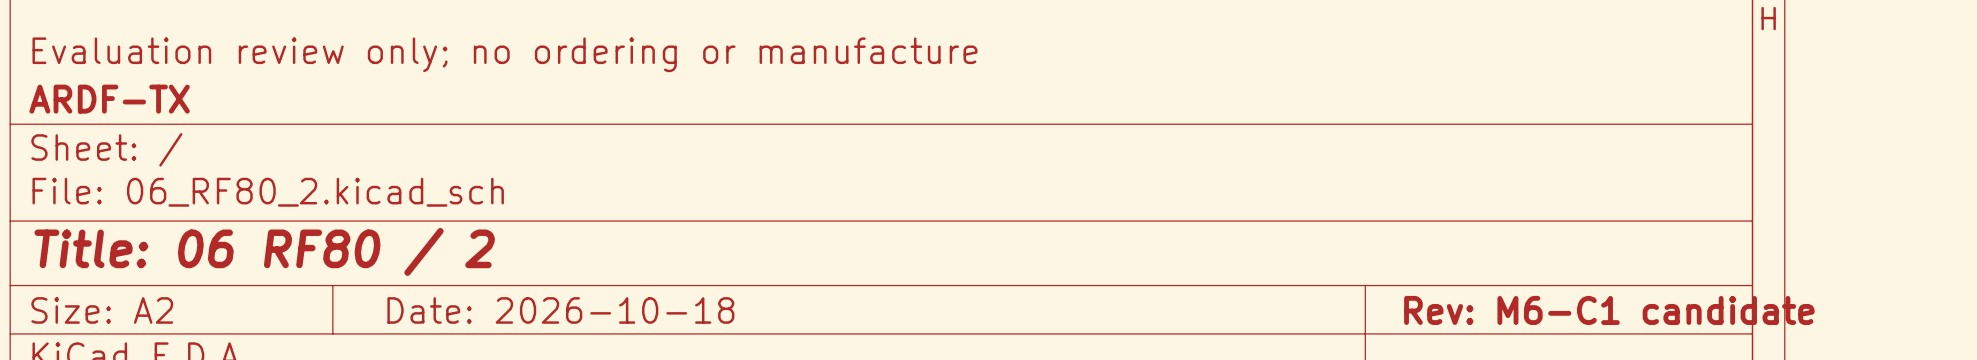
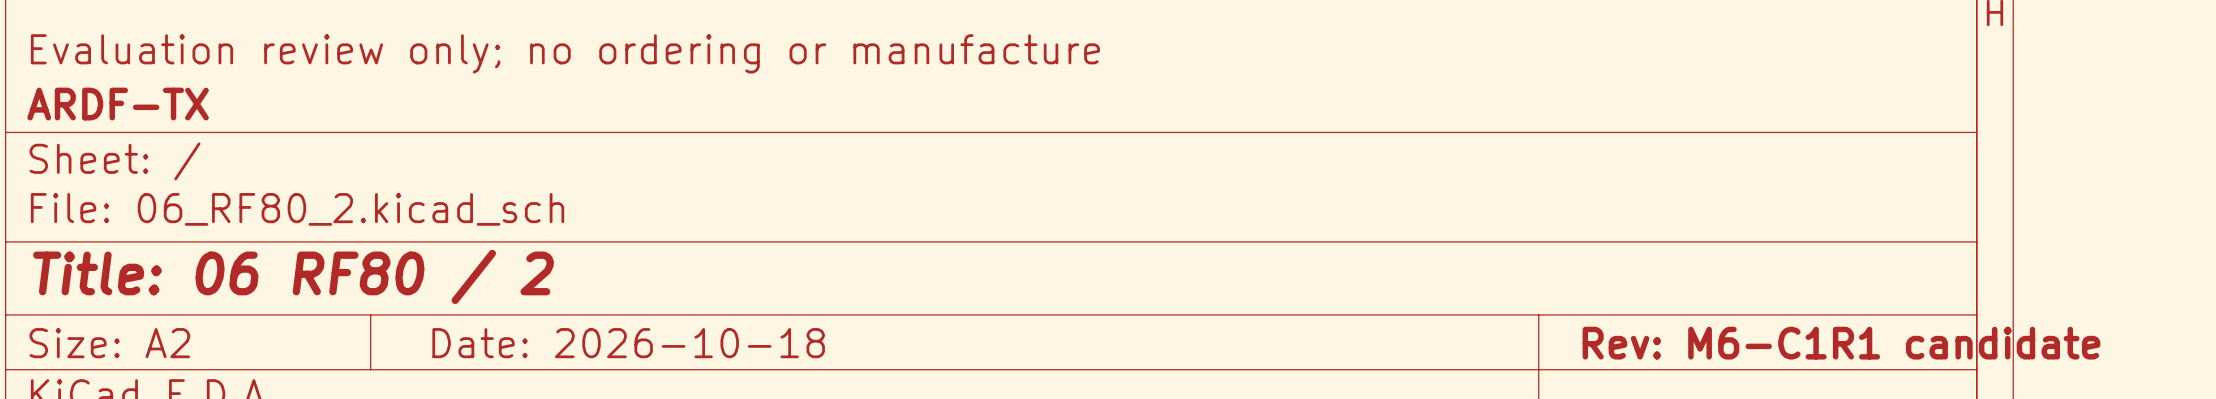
title block: Rev: M6-C1 candidate (1609, 310) -> Rev: M6-C1R1 candidate (1841, 343)

